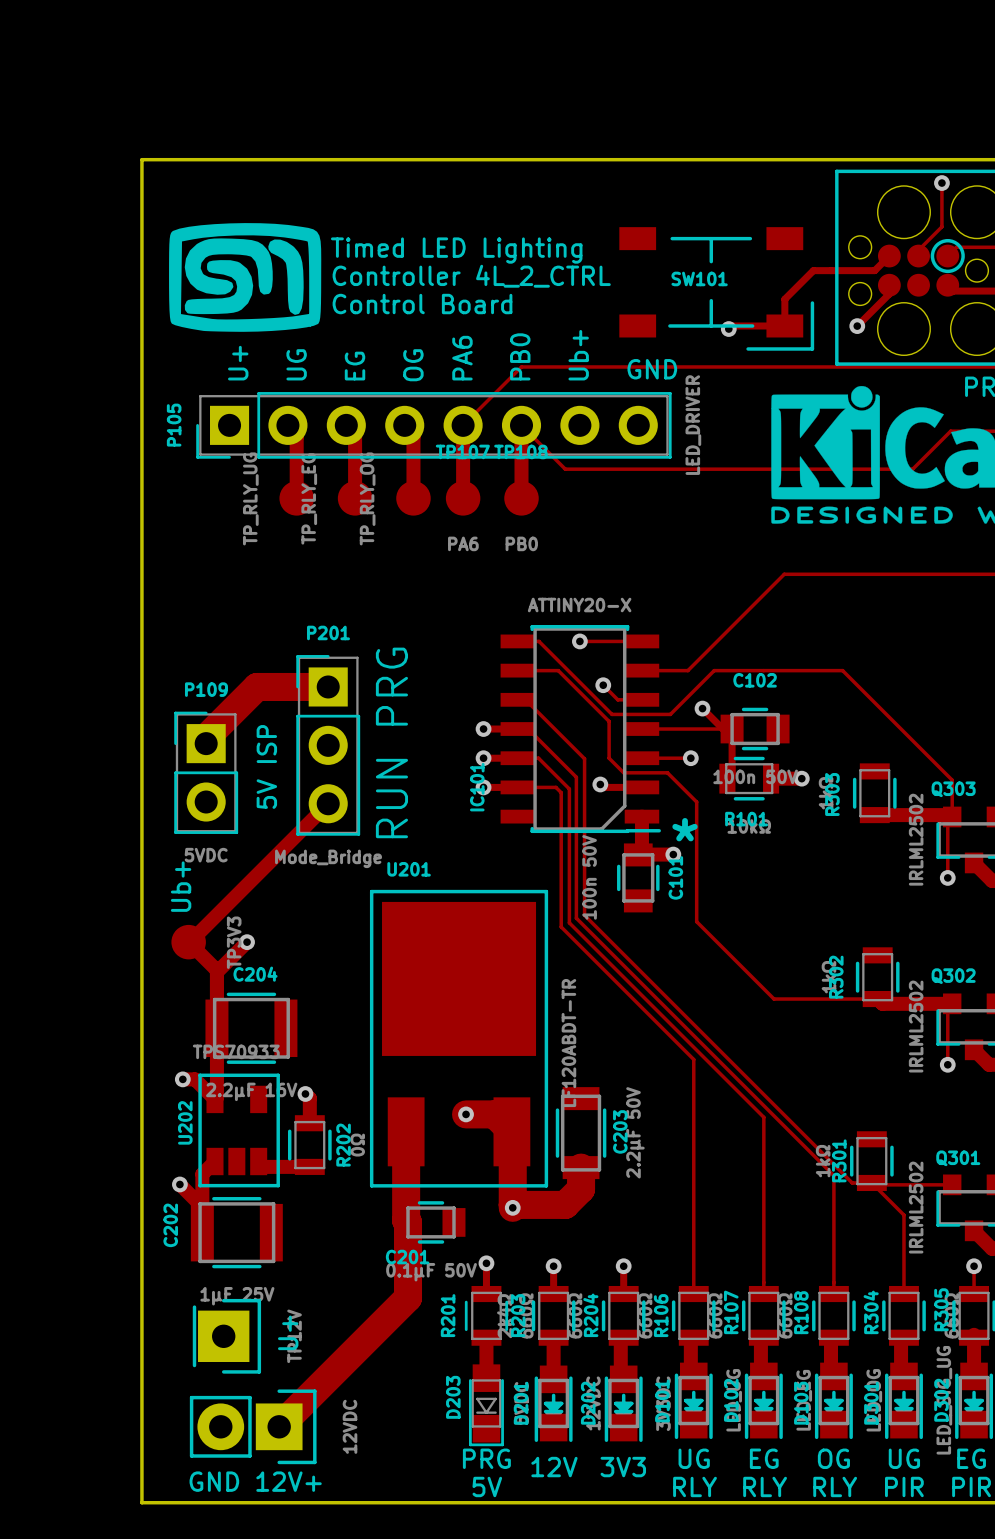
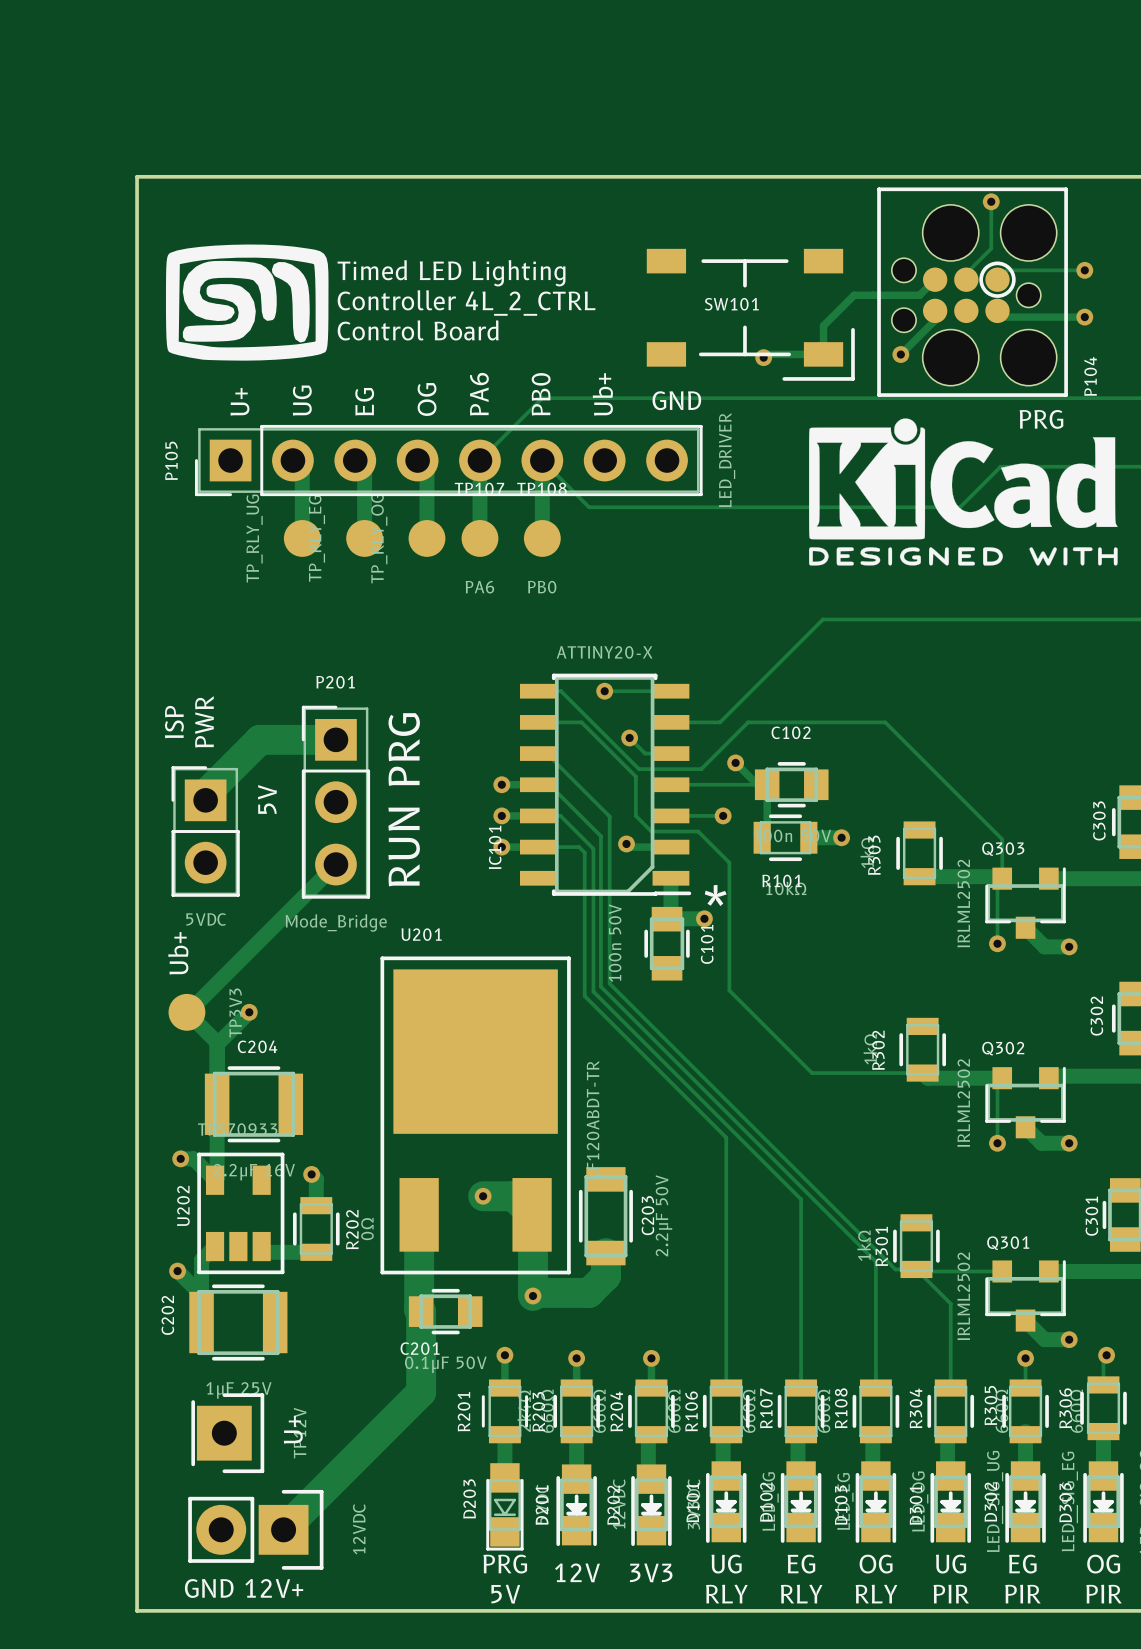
text: none -> ISP (174, 722)
text: none -> PWR (204, 721)
P109 name: P109 (206, 689) -> none
text: none -> 5V (267, 799)
text: 5V ISP (266, 766) -> none

